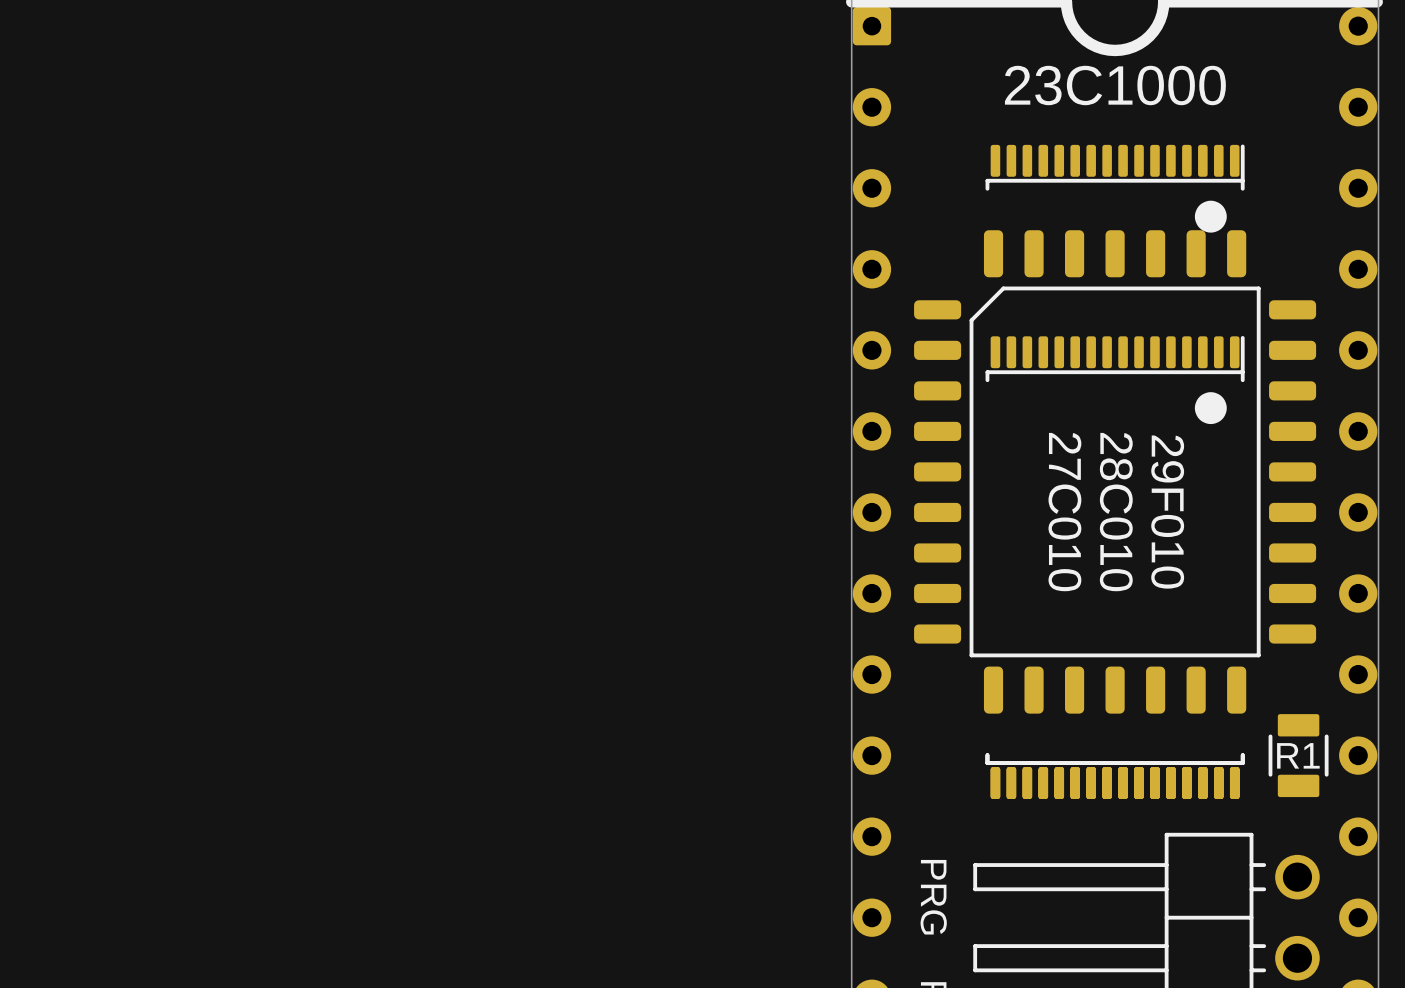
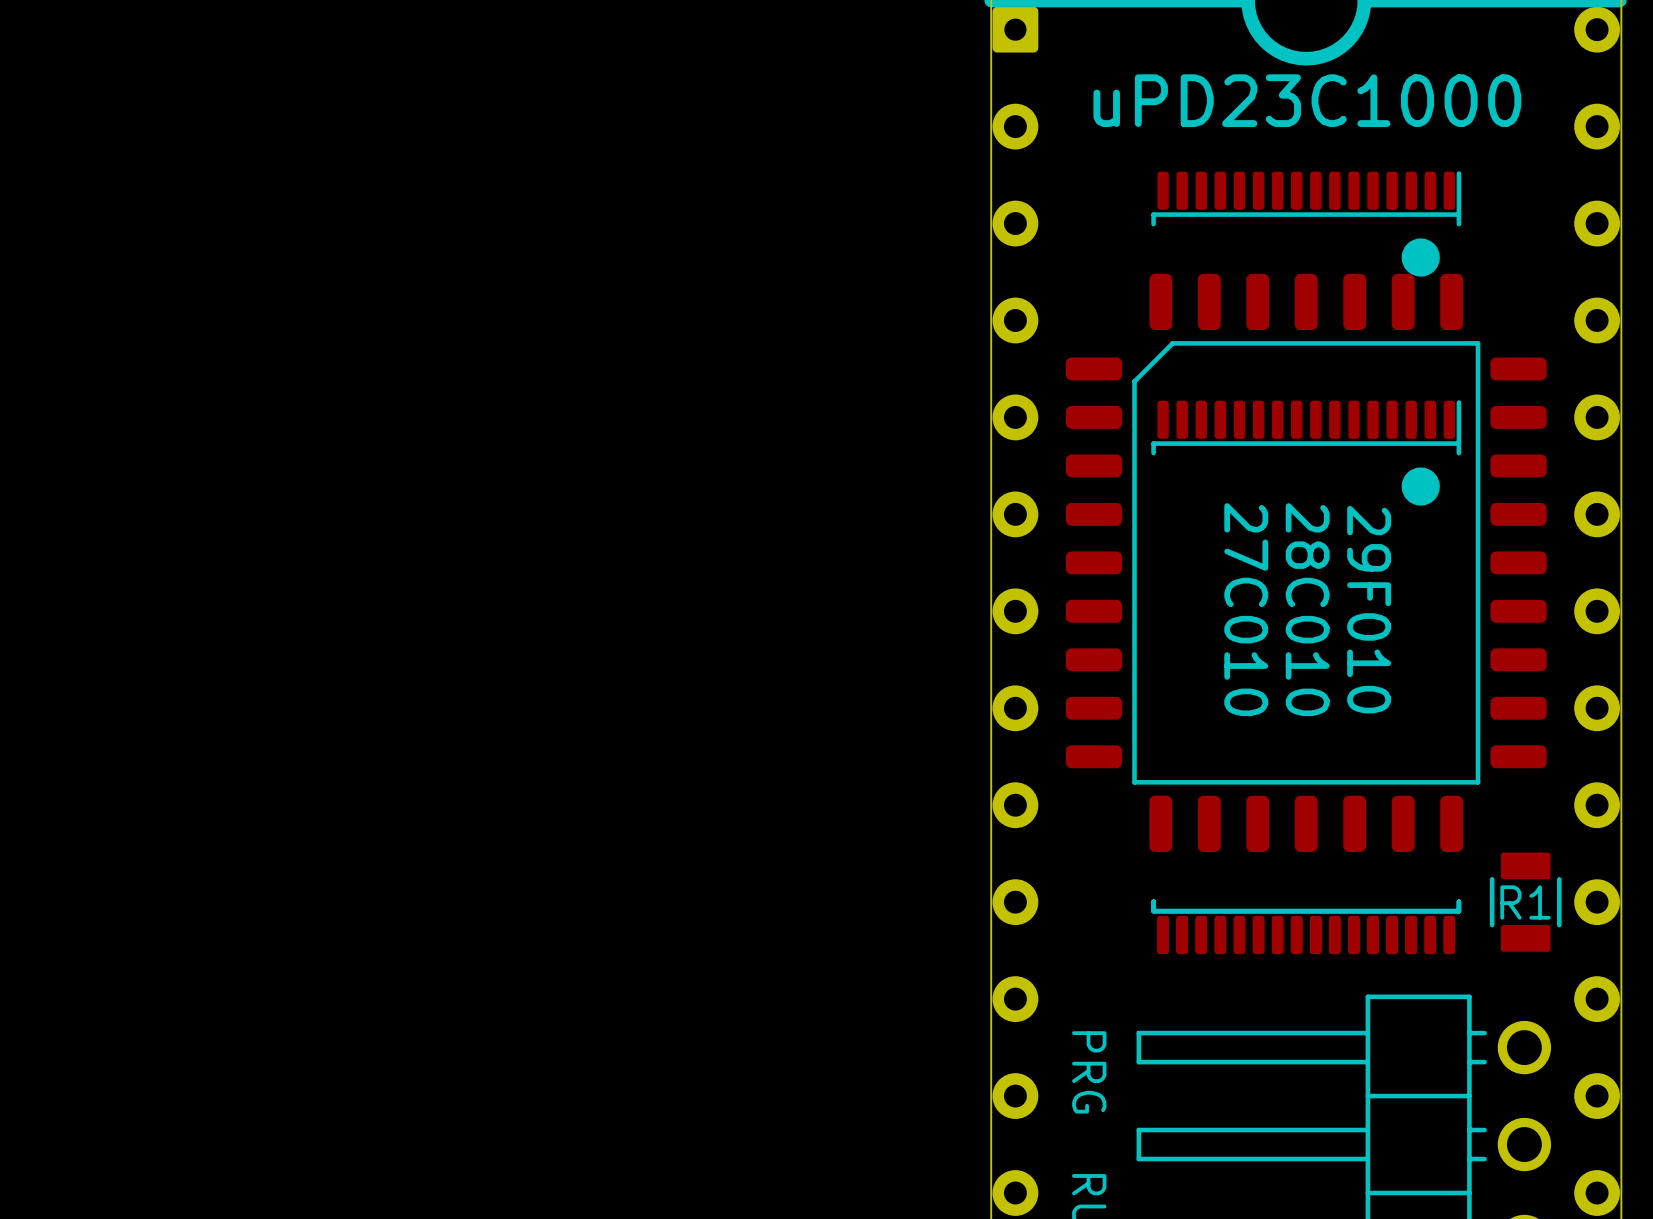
text: 23C1000 (1115, 85) -> uPD23C1000 (1307, 100)

